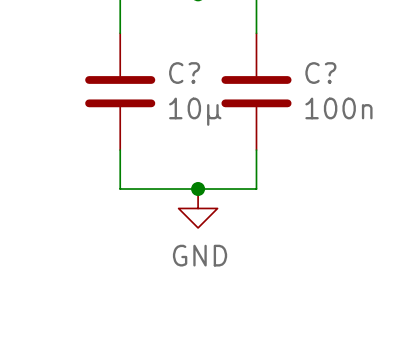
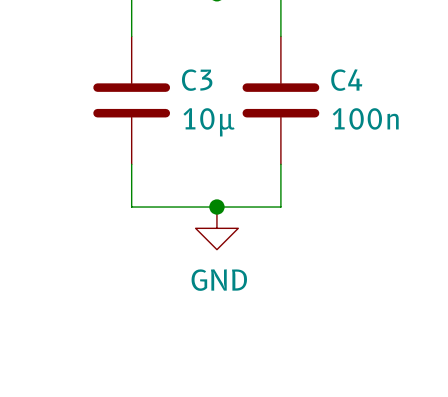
C? name: C? (184, 73) -> C3 (197, 80)
C? name: C? (320, 73) -> C4 (346, 80)

